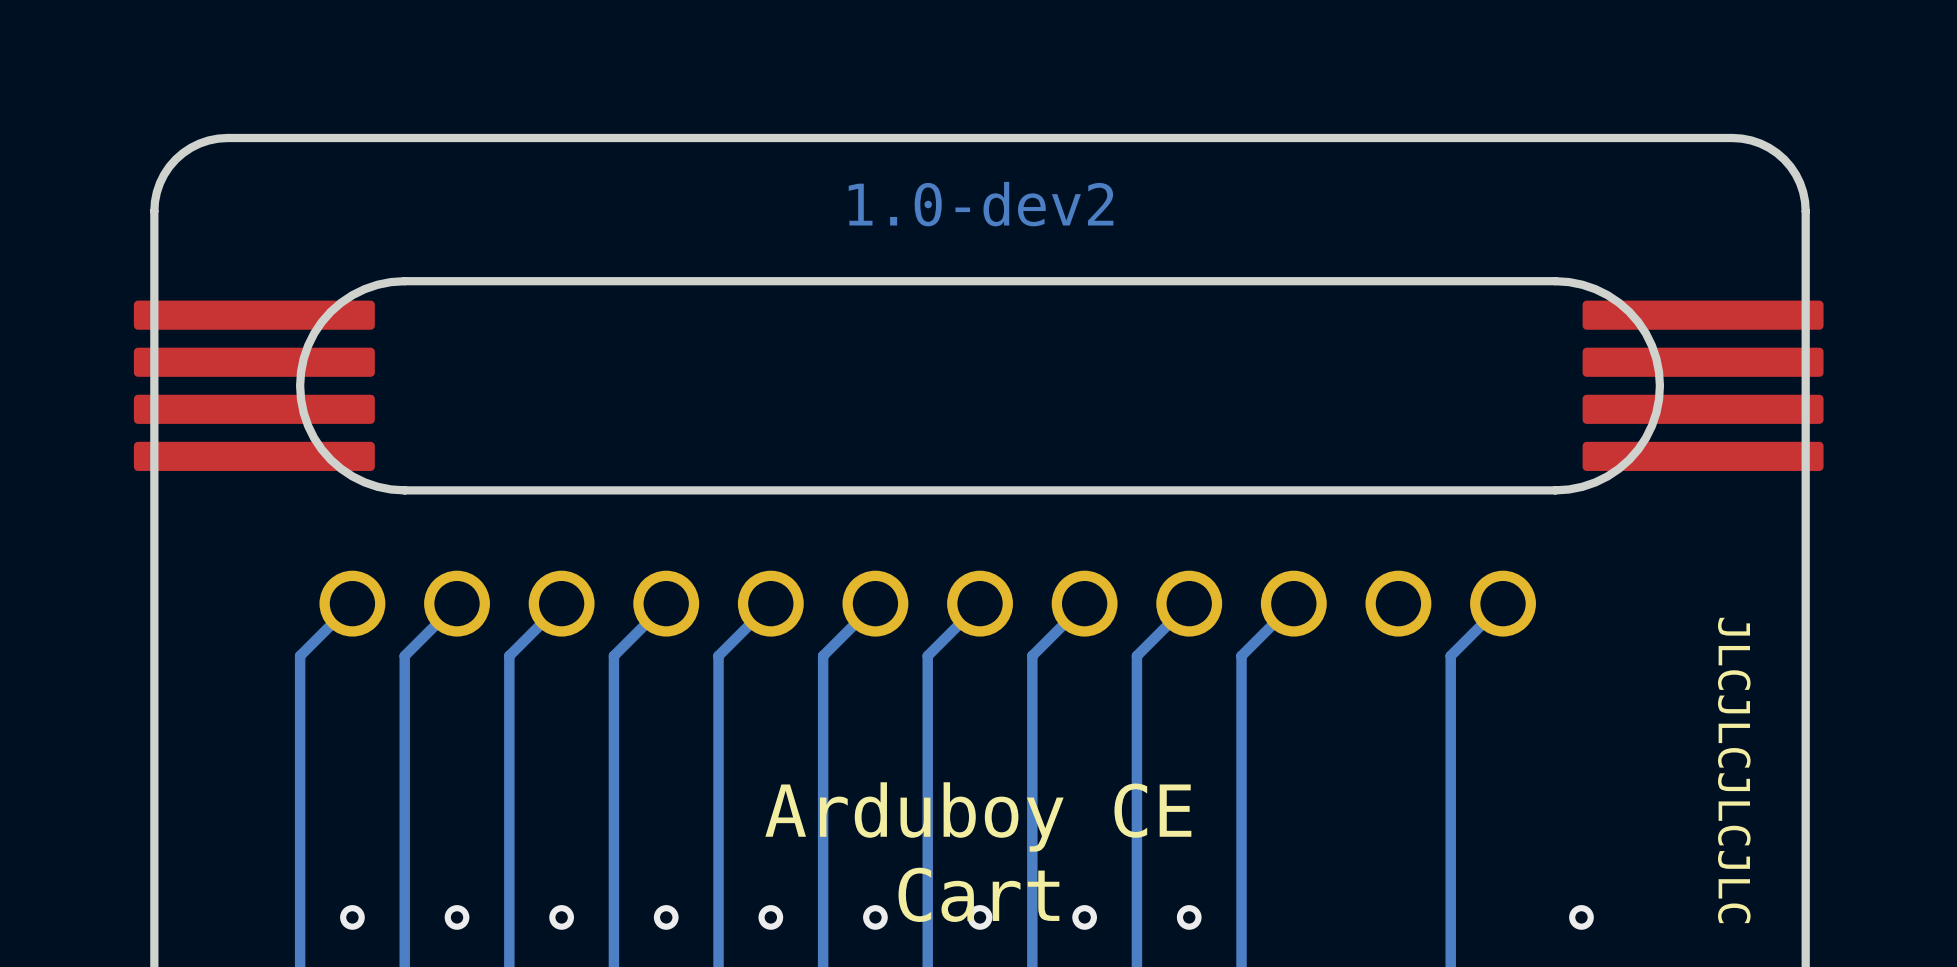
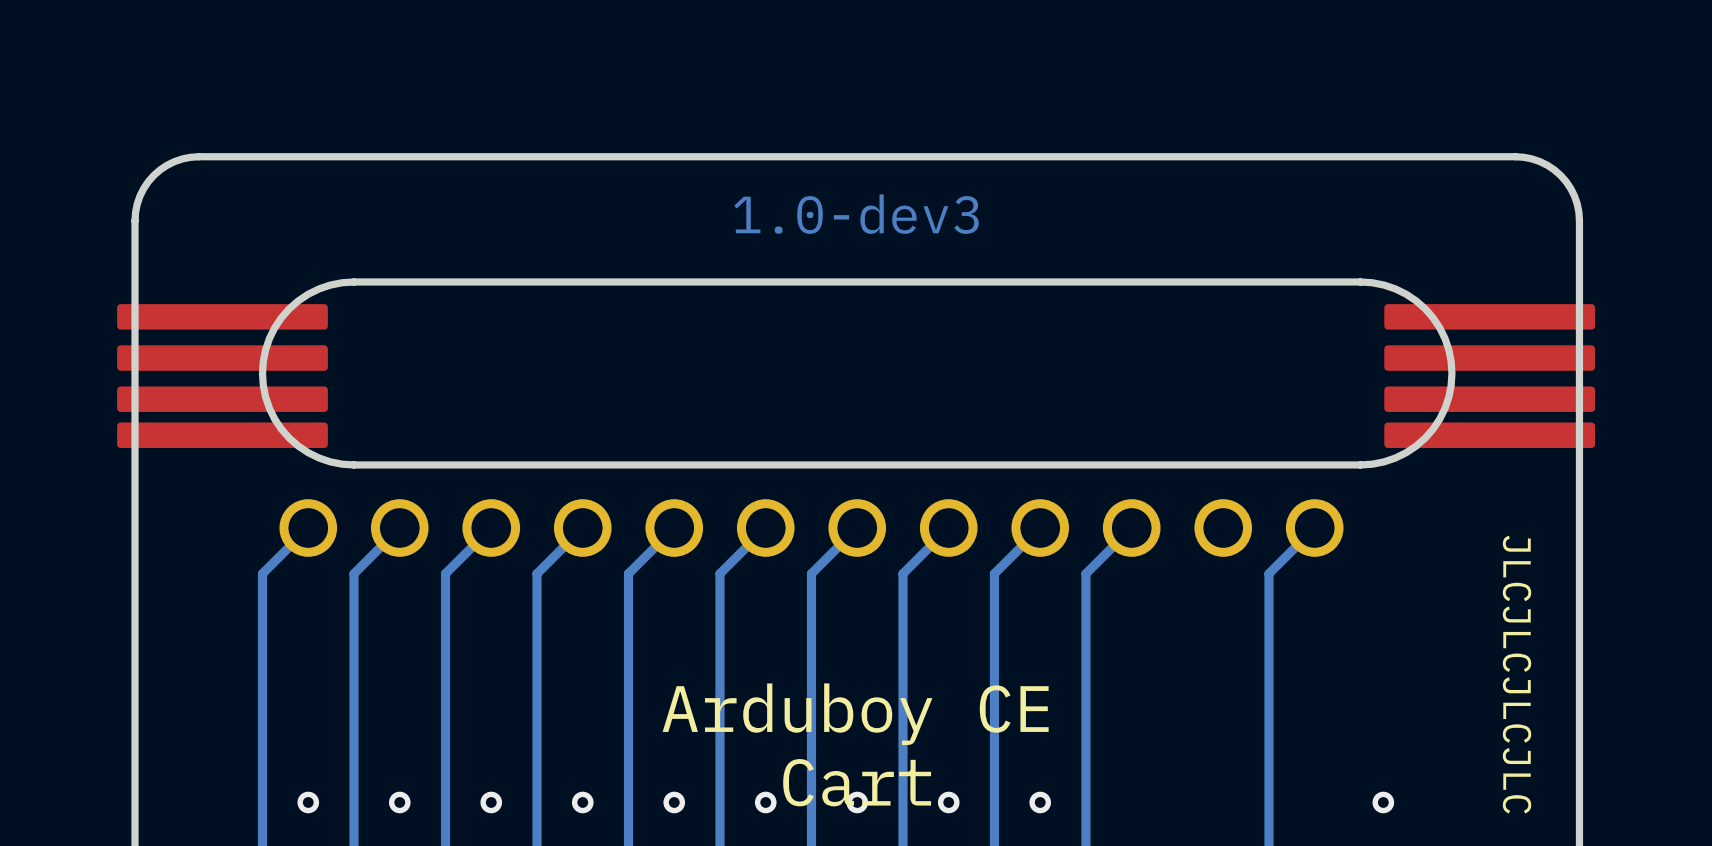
text: 1.0-dev2 (981, 204) -> 1.0-dev3 (856, 214)
board edge: (1805, 252) (1805, 201) (1795, 174) (1784, 159) (1769, 147) (1742, 138) (227, 138) (208, 140) (190, 147) (175, 159) (164, 174) (154, 201) (154, 252) -> (1579, 220) (1574, 196) (1560, 175) (1539, 161) (1515, 156) (199, 156) (174, 161) (153, 175) (139, 196) (135, 220)
board edge: (1555, 281) (391, 282) (377, 284) (352, 295) (330, 311) (321, 322) (308, 345) (303, 358) (301, 372) (301, 399) (308, 425) (321, 449) (330, 459) (352, 476) (377, 486) (391, 489) (1568, 489) (1582, 486) (1607, 476) (1629, 459) (1638, 449) (1651, 425) (1656, 412) (1659, 385) (1656, 358) (1651, 345) (1638, 322) (1629, 311) (1607, 295) (1595, 289) (1582, 284) (1555, 281) -> (1360, 281) (342, 282) (330, 285) (308, 294) (289, 308) (281, 317) (269, 338) (265, 349) (263, 361) (263, 385) (269, 408) (281, 429) (289, 438) (308, 452) (330, 461) (342, 464) (1372, 464) (1384, 461) (1406, 452) (1425, 438) (1433, 429) (1444, 408) (1448, 397) (1451, 373) (1448, 349) (1444, 338) (1433, 317) (1425, 308) (1406, 294) (1395, 288) (1384, 285) (1360, 281)
drawing position: (254, 315) -> (222, 435)
drawing position: (1703, 315) -> (1489, 435)

